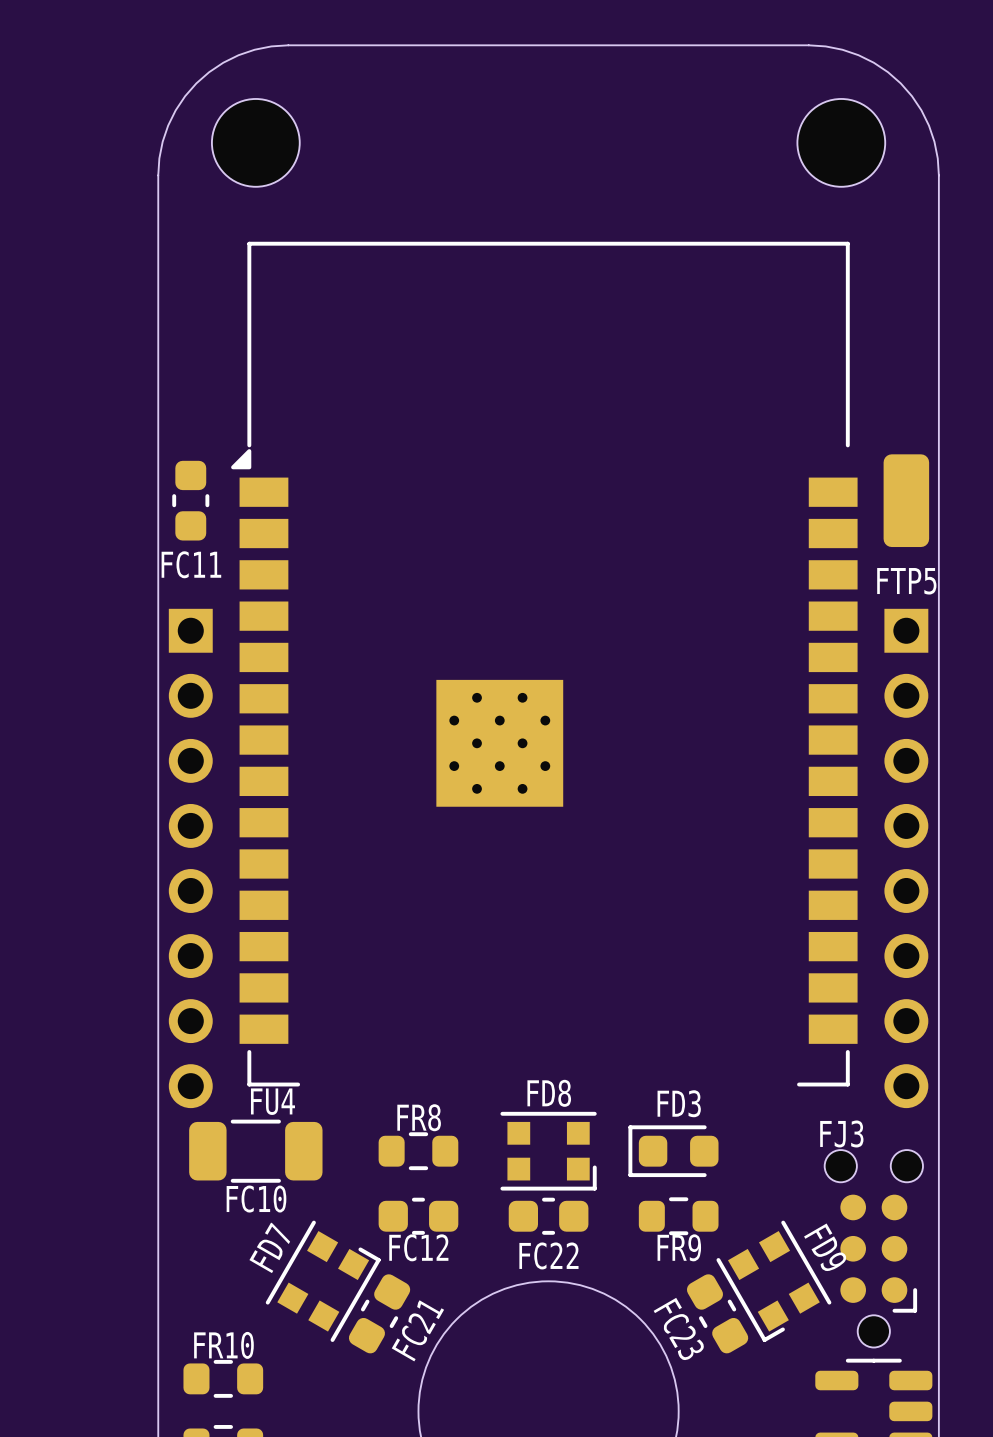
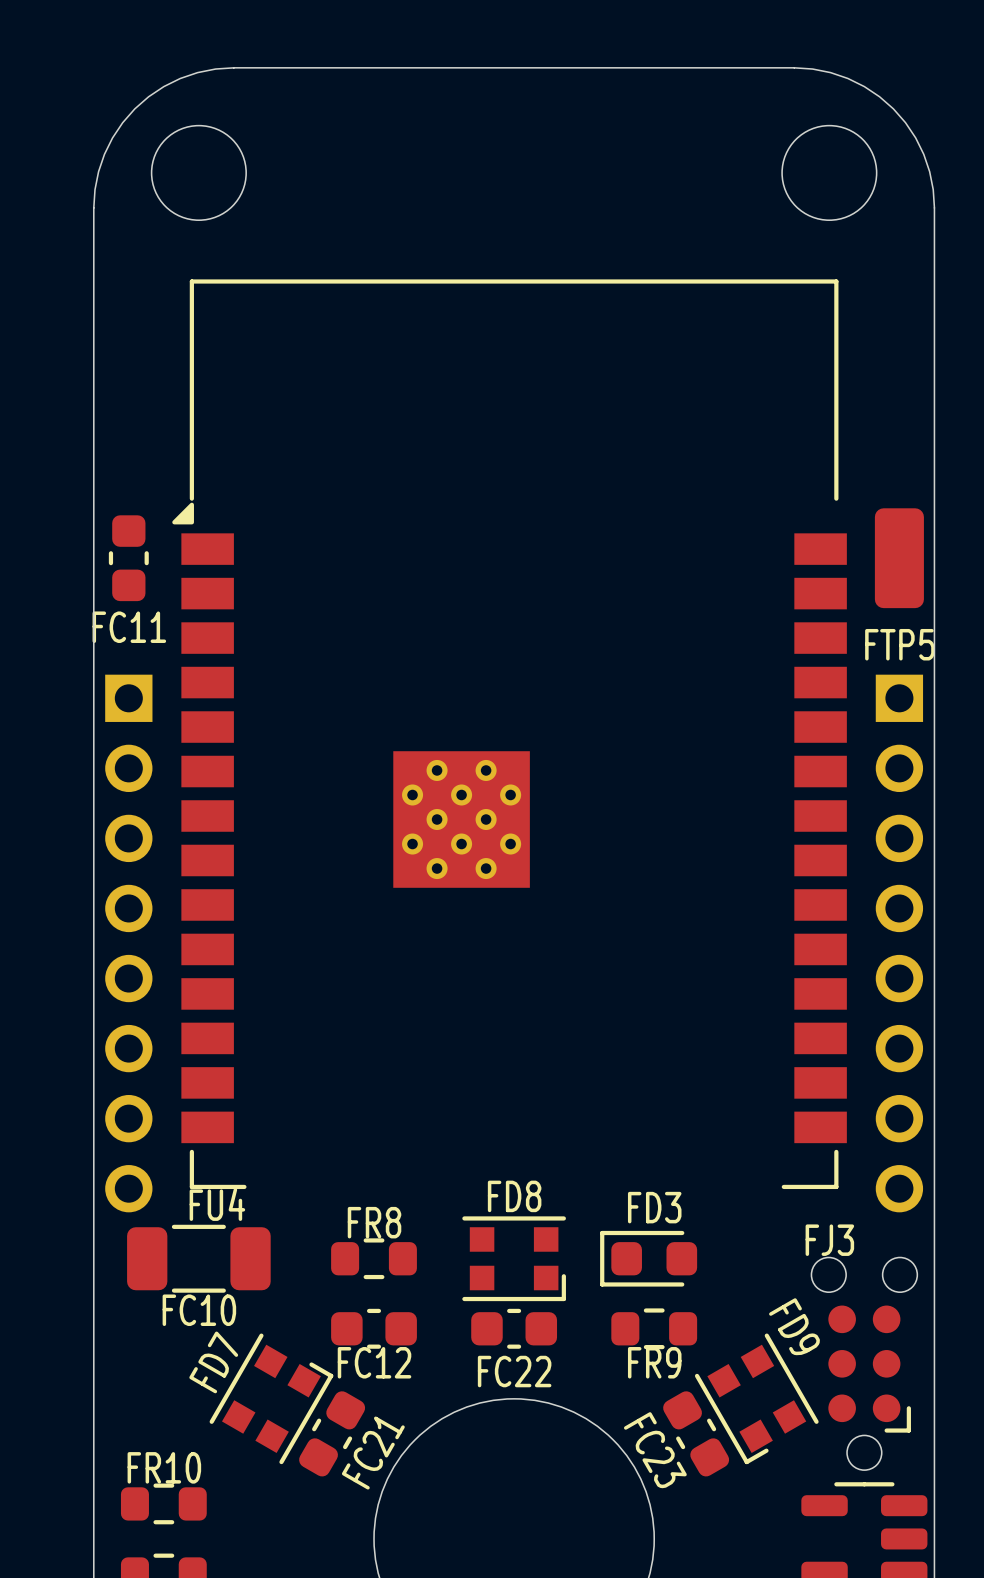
FD9 name position: FD9 (825, 1247) -> FD9 (794, 1326)

